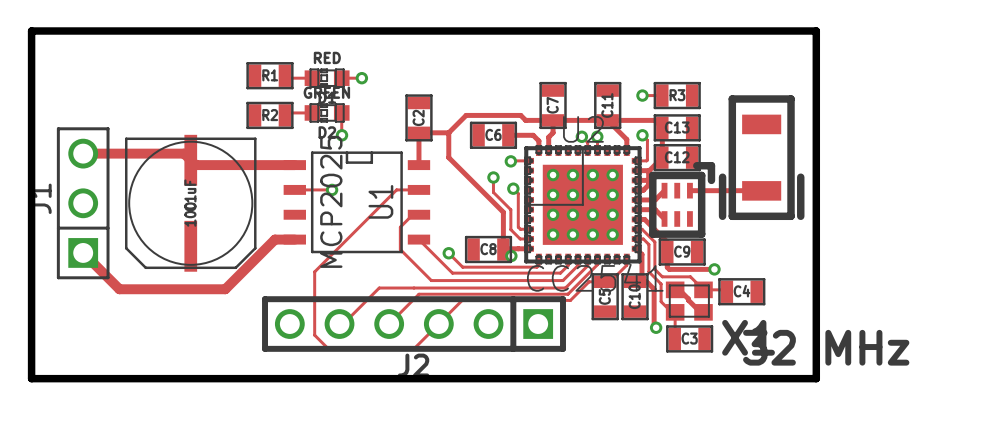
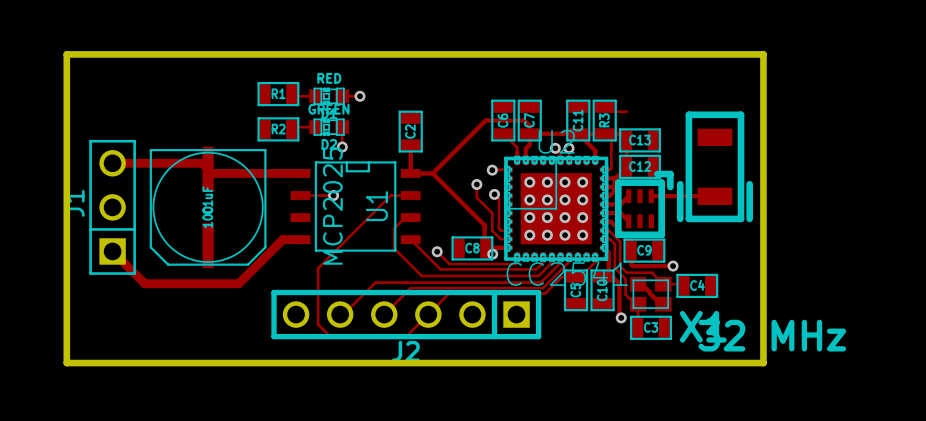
via: (642, 95) -> none
R3 rotation: 0° (677, 95) -> 90° clockwise (604, 120)
R3 position: (677, 95) -> (604, 120)
track: (553, 120) (525, 120) (520, 115) (466, 115) (448, 132) -> (529, 133) (529, 126) (524, 120) (485, 120) (432, 173)
track: (418, 132) (448, 132) -> none
track: (448, 132) (448, 157) (503, 212) (503, 249) -> (432, 173) (484, 225) (485, 248)
C6 rotation: 0° (493, 135) -> 90° clockwise (503, 120)
C6 position: (493, 135) -> (503, 120)
track: (508, 135) (533, 135) (538, 141) -> (503, 133) (517, 147) (517, 152)
track: (642, 135) (647, 140) (647, 160) (643, 160) -> (604, 133) (611, 140) (609, 169)
via: (642, 135) -> none
track: none -> (410, 173) (432, 173)

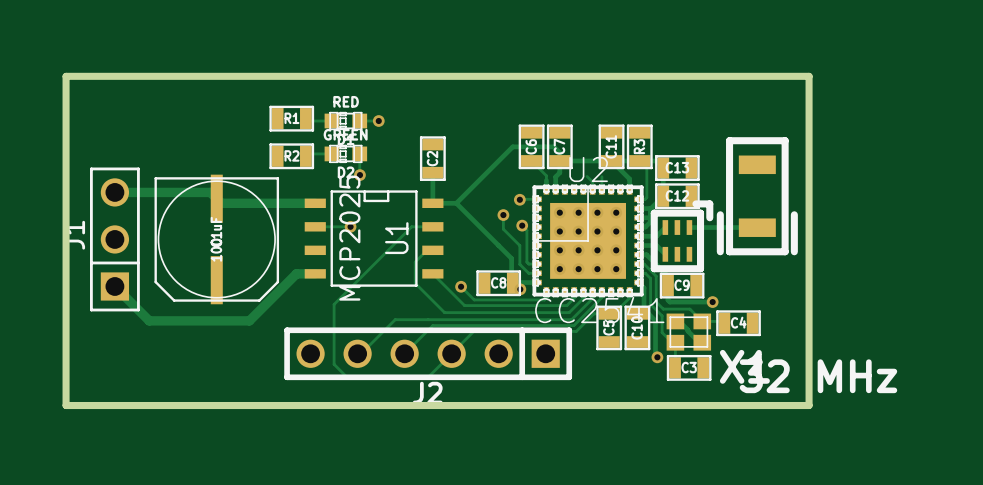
track: (609, 111) (626, 111) -> none
via: (555, 148) -> none
via: (569, 148) -> none

